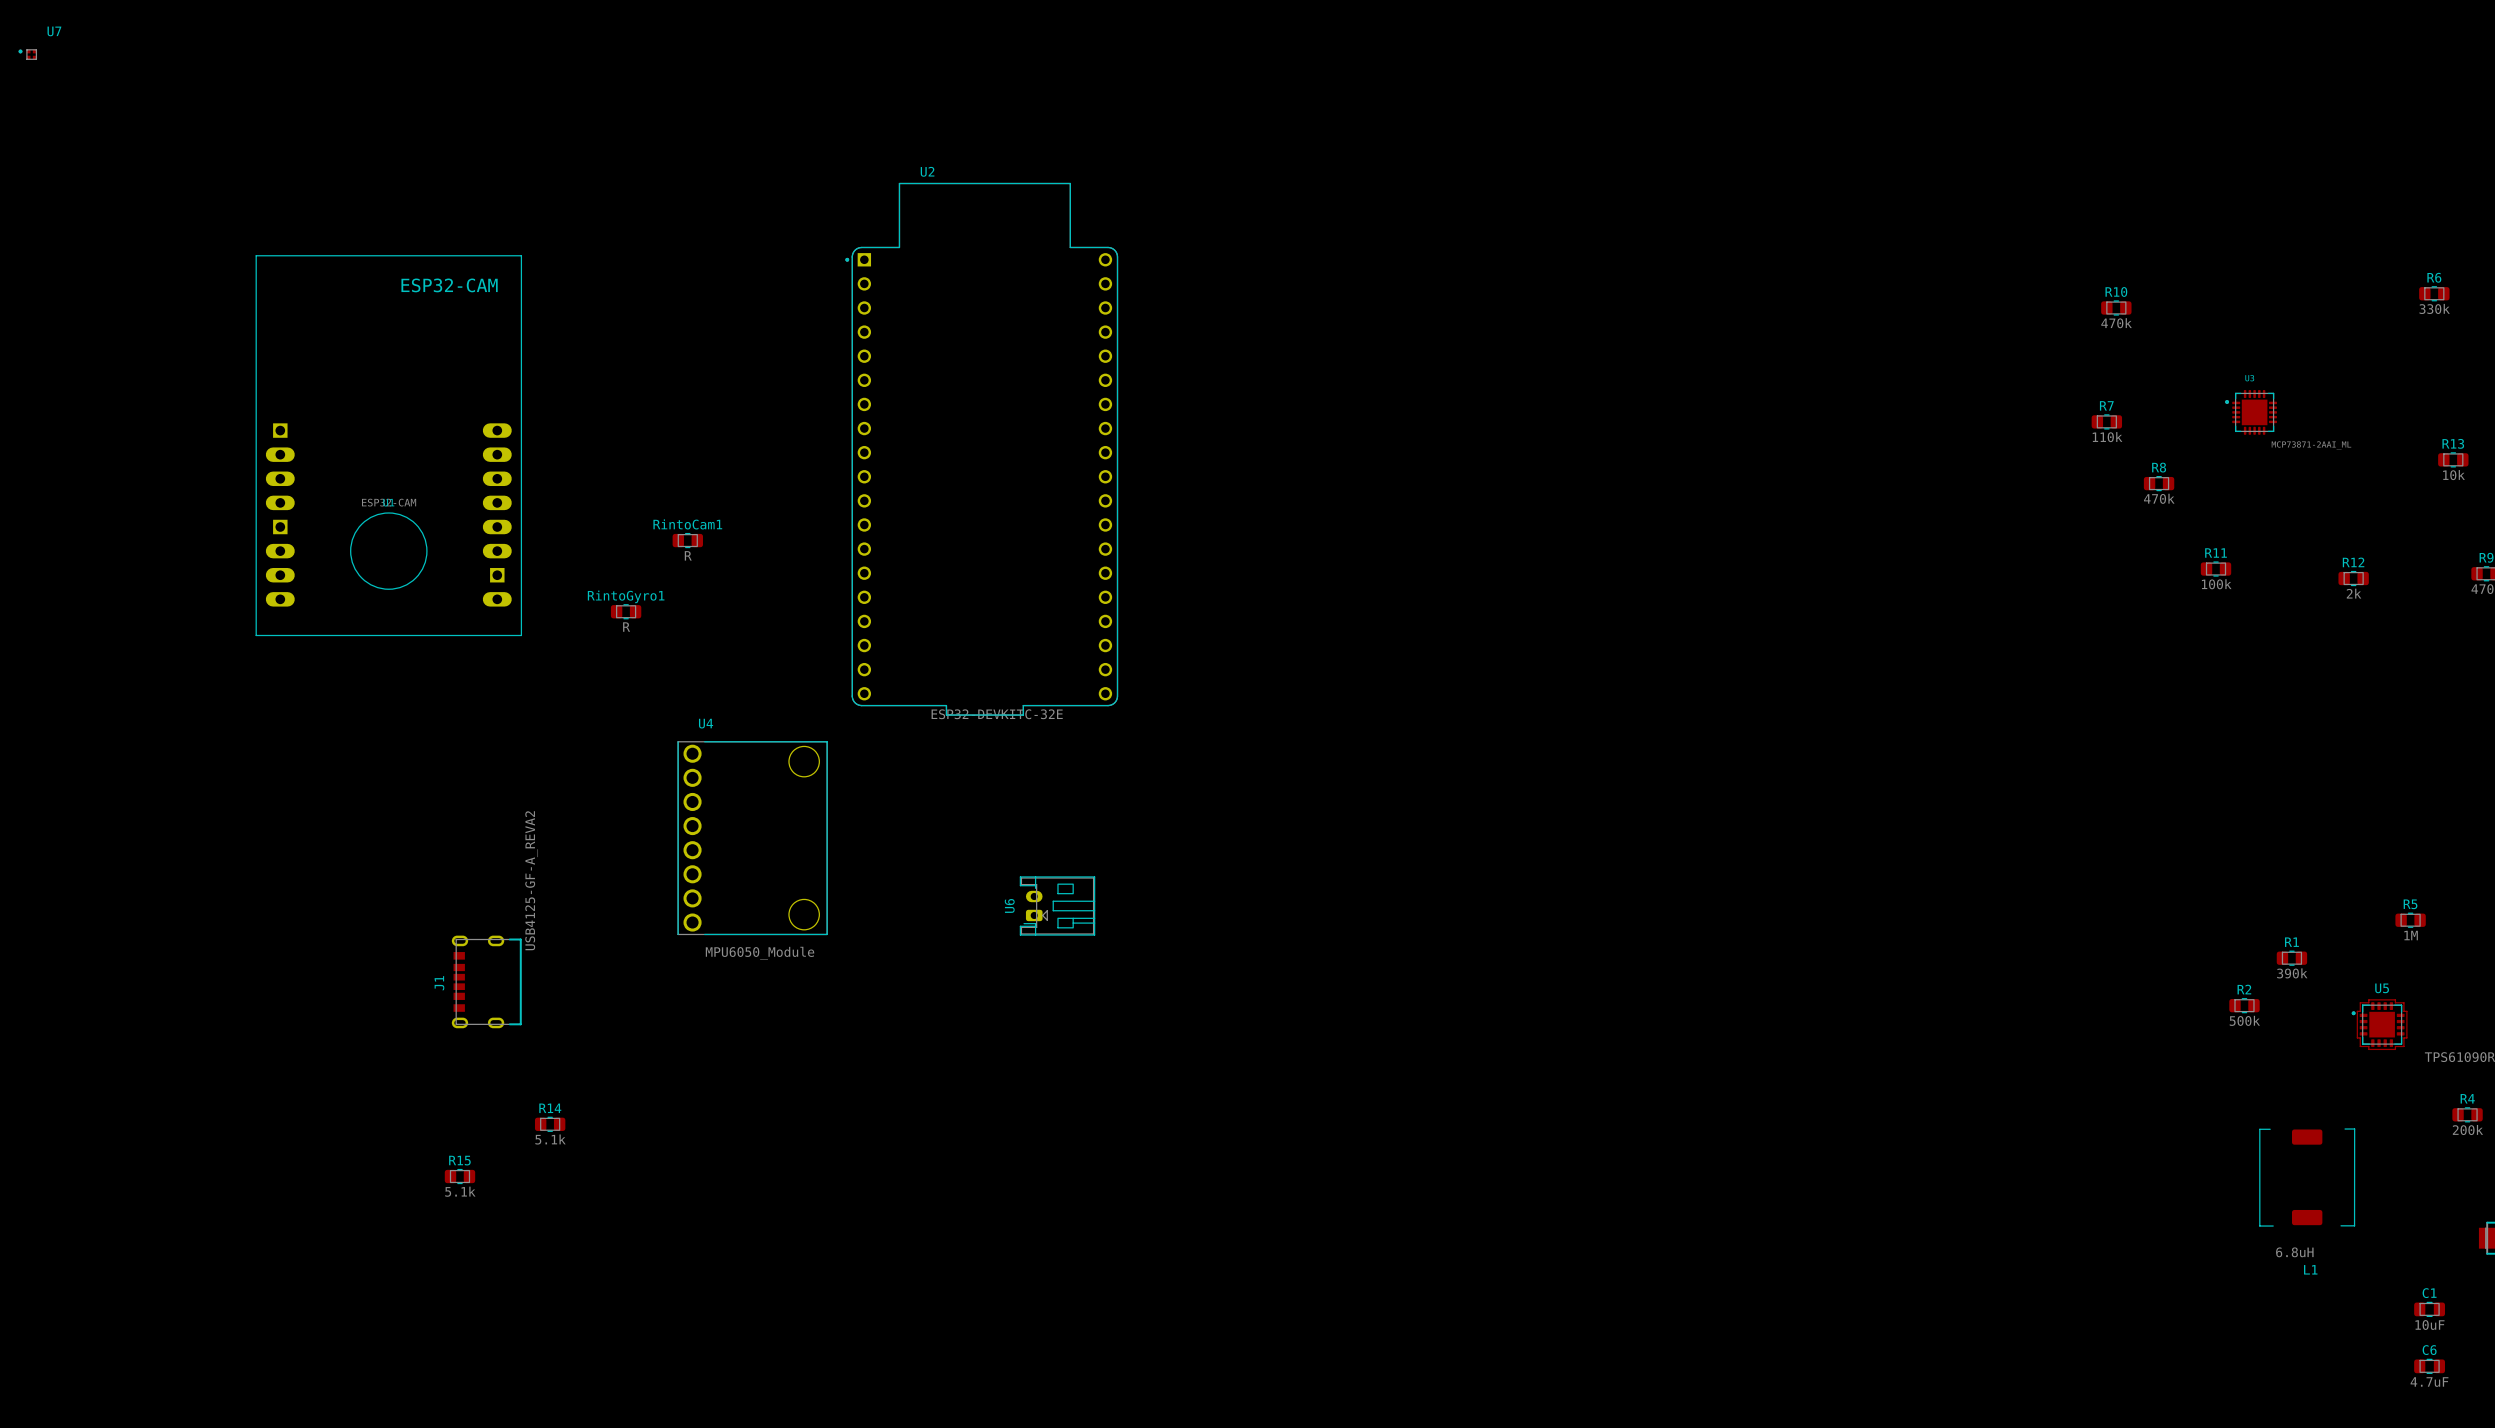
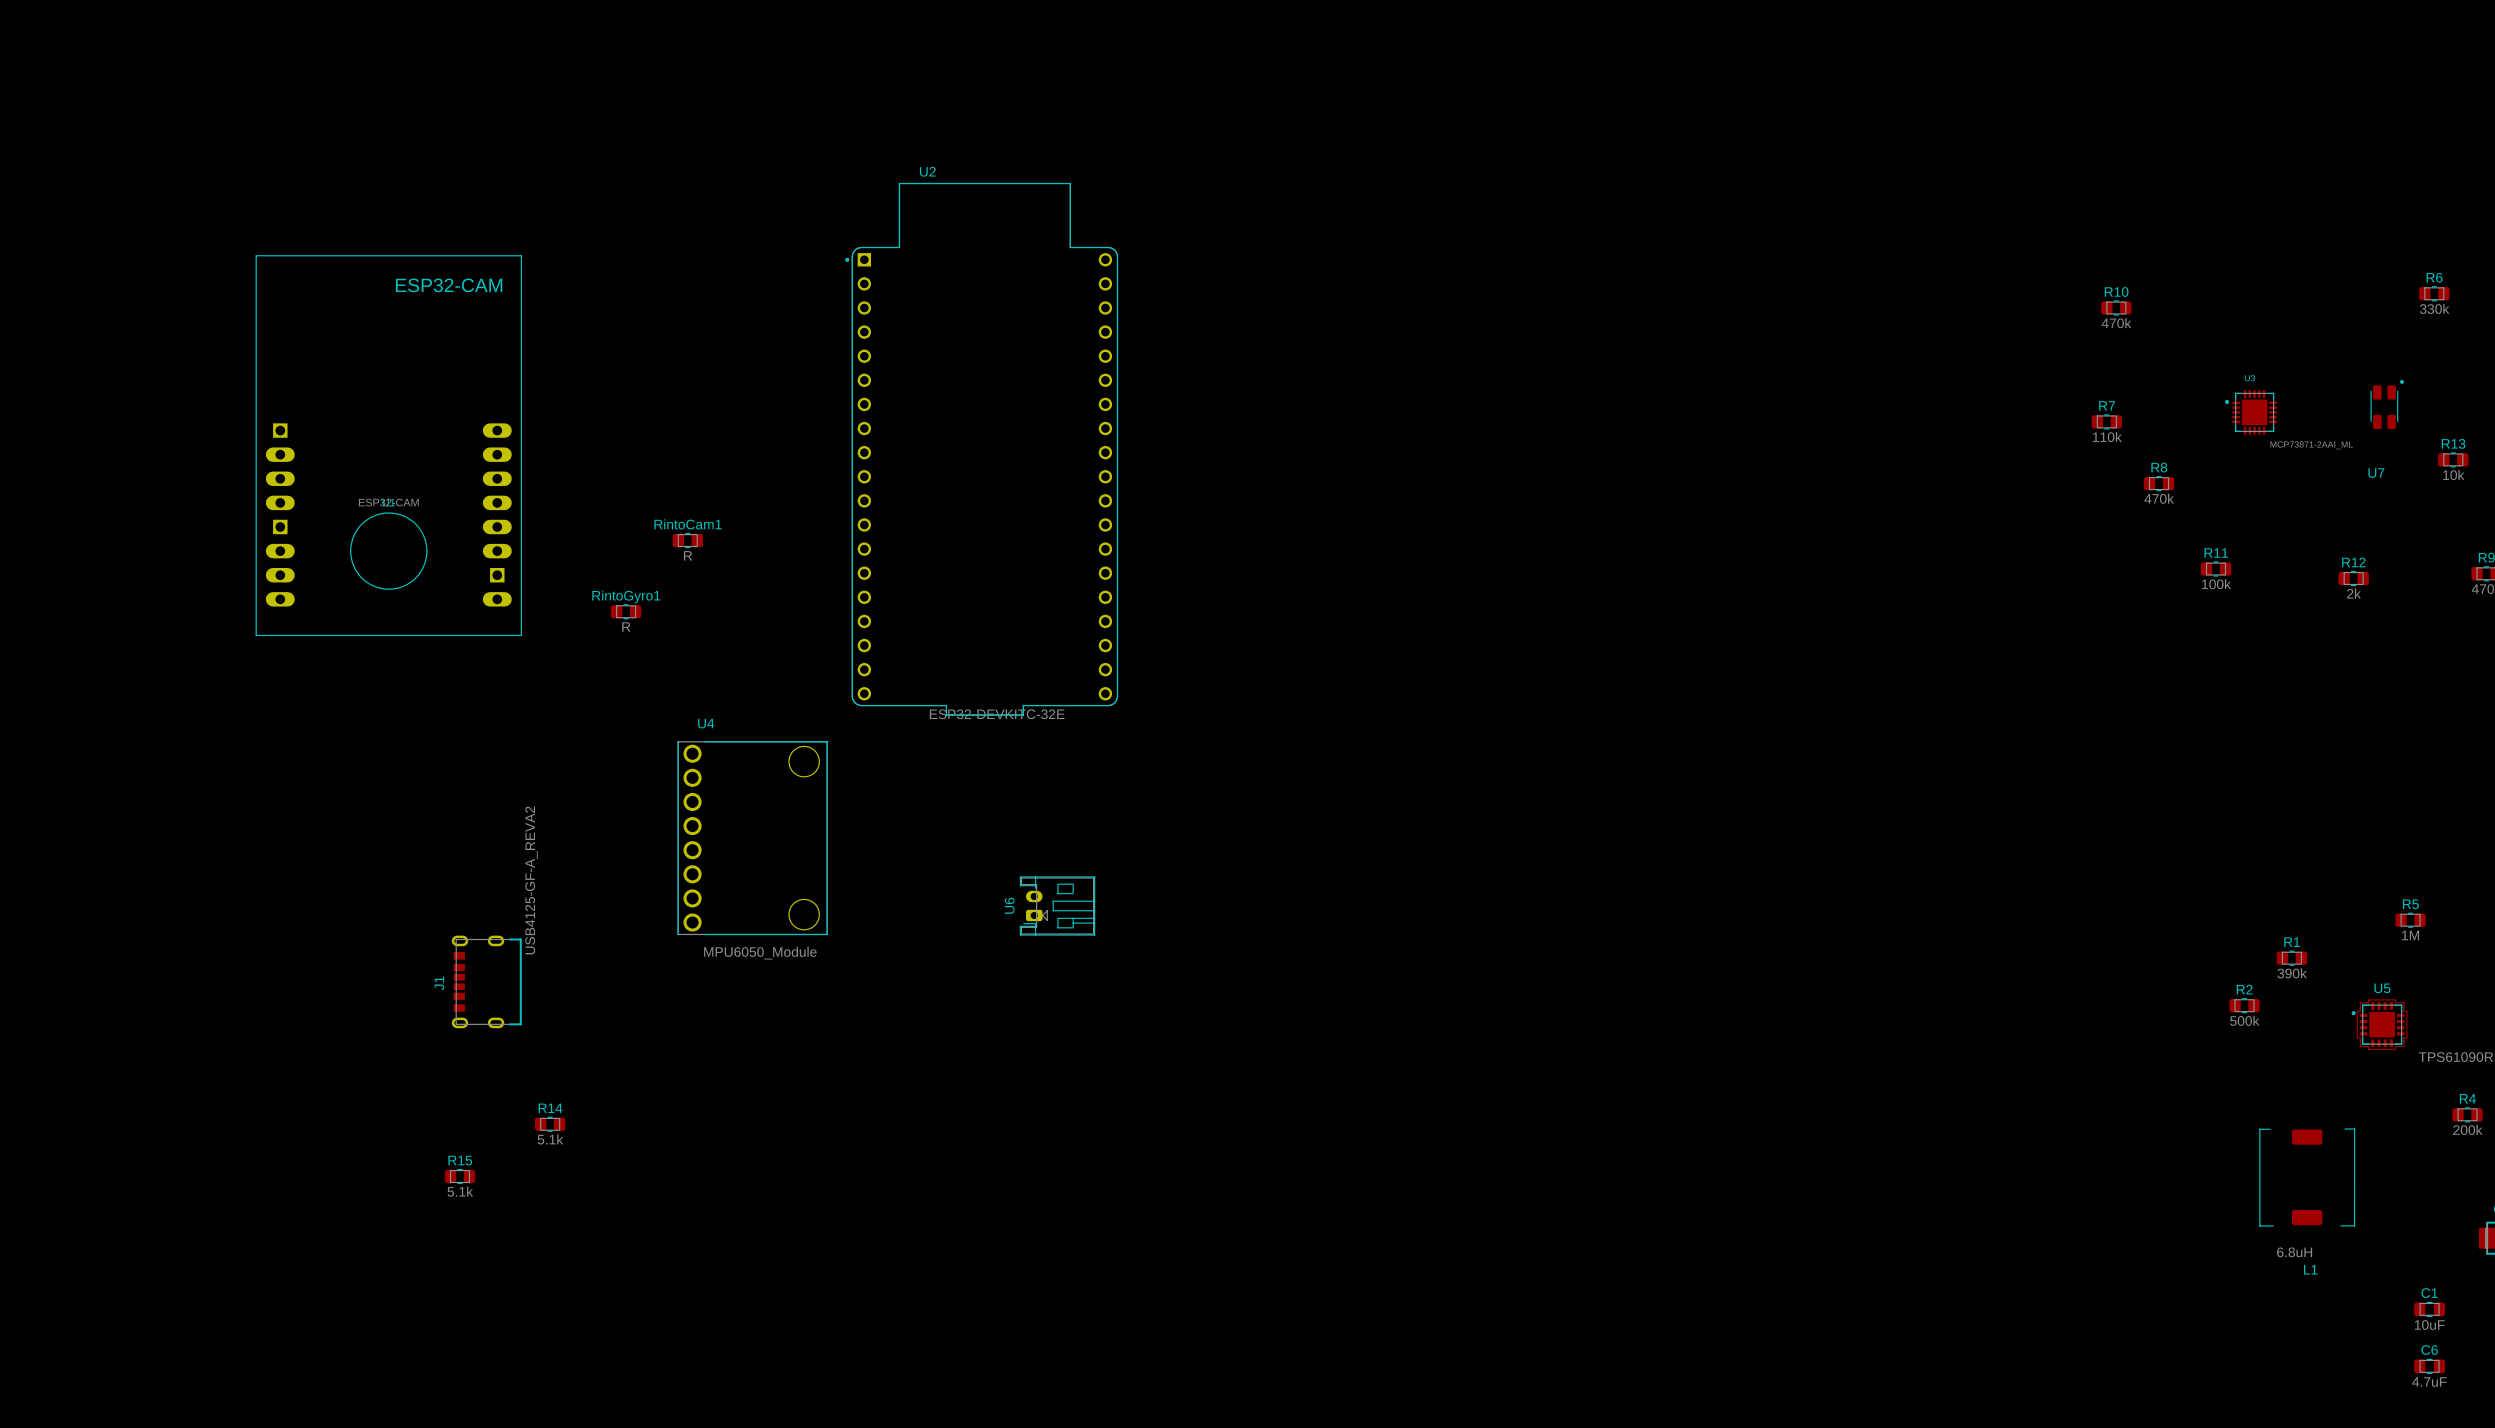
U7 name position: U7 (54, 31) -> U7 (2376, 473)
U7 footprint: [18, 49, 38, 60] -> [2370, 379, 2404, 430]

